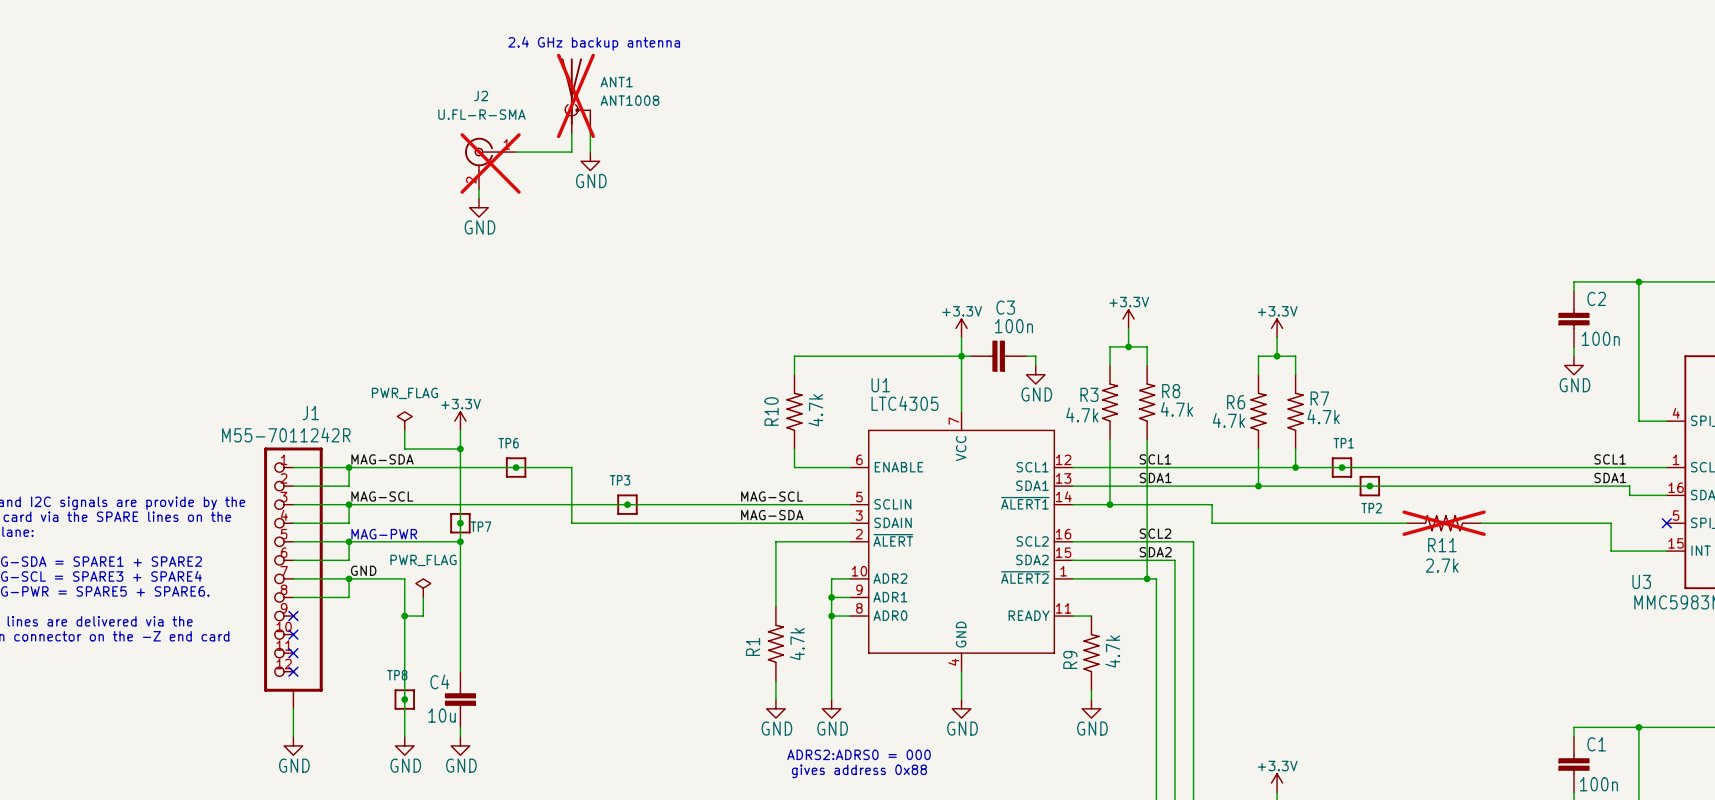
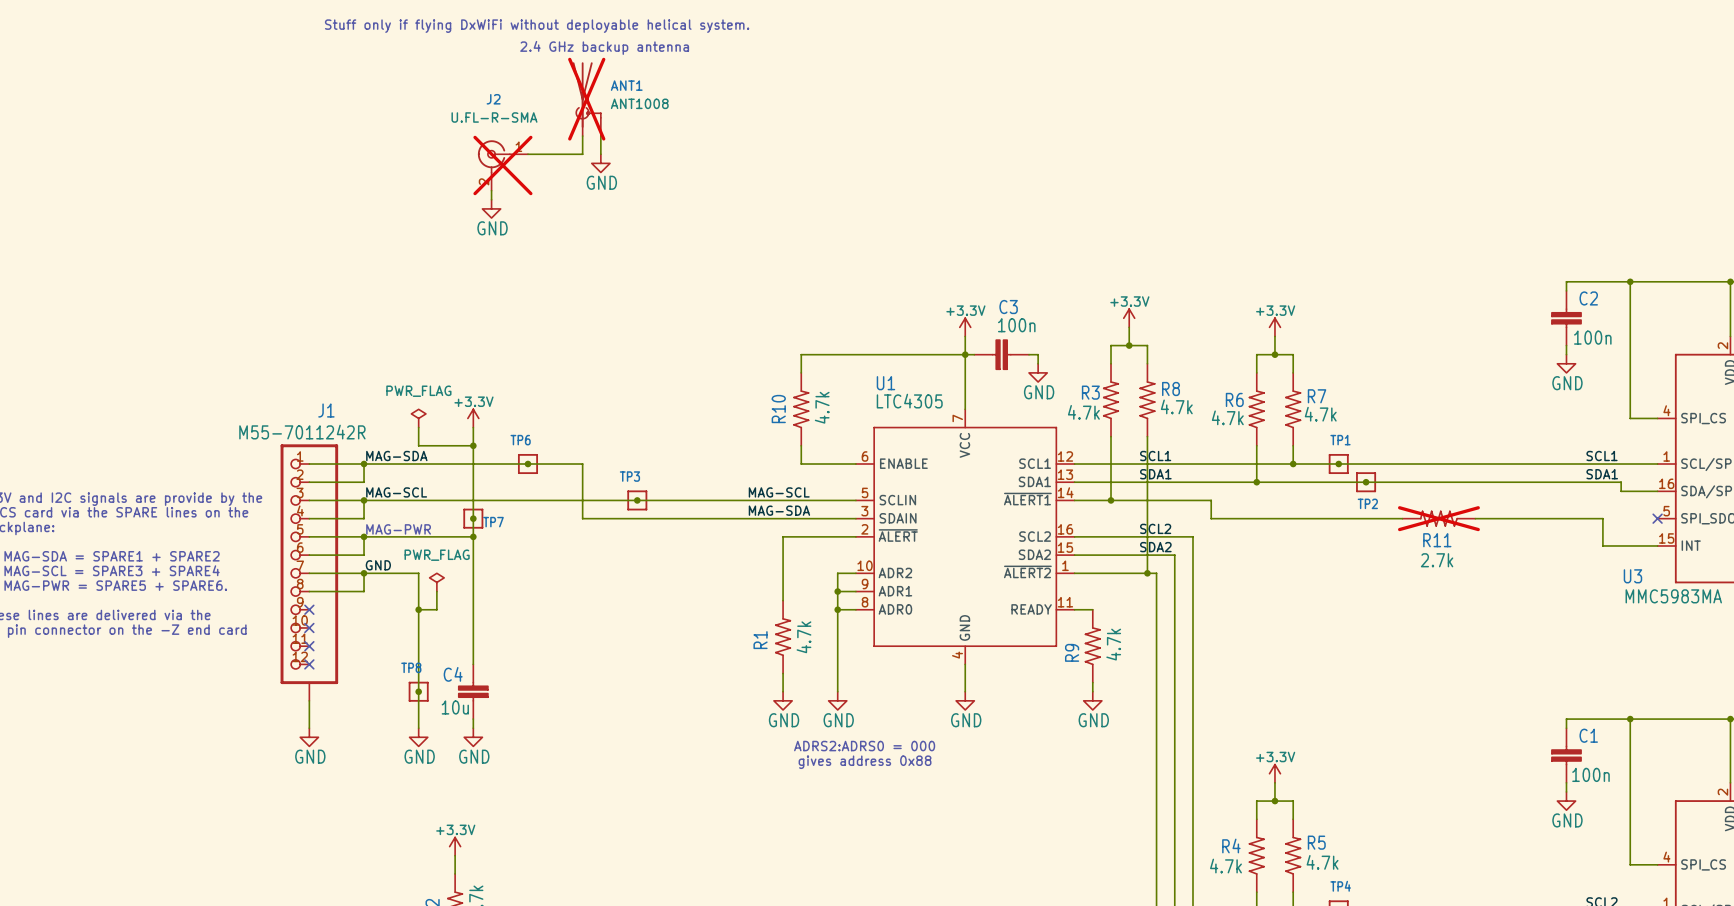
text: none -> Stuff only if flying DxWiFi without deployable helical system. (537, 26)

